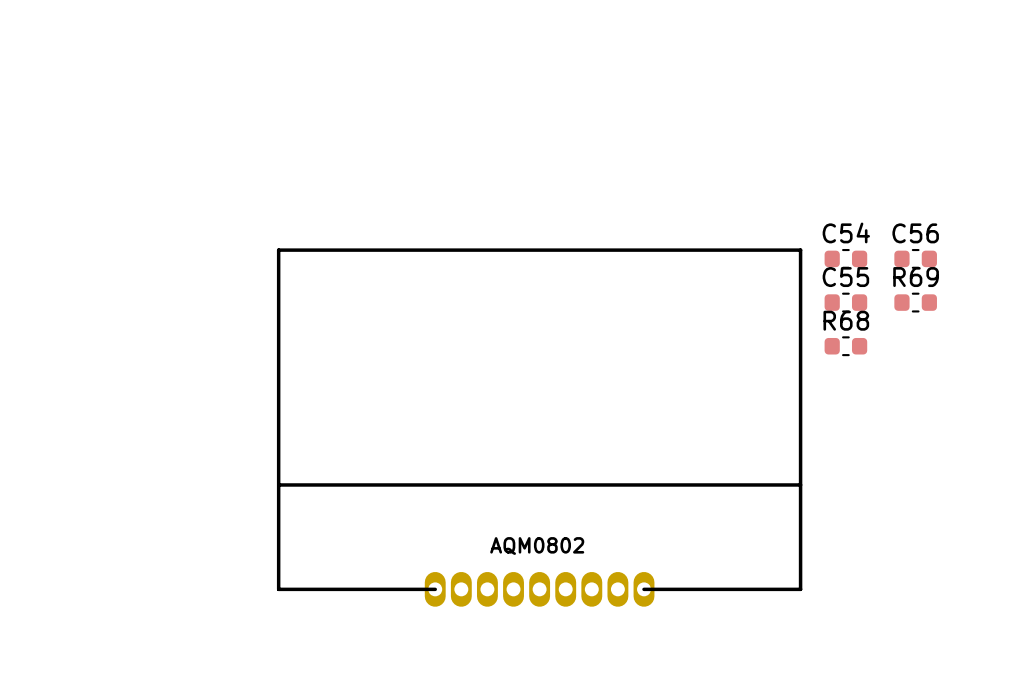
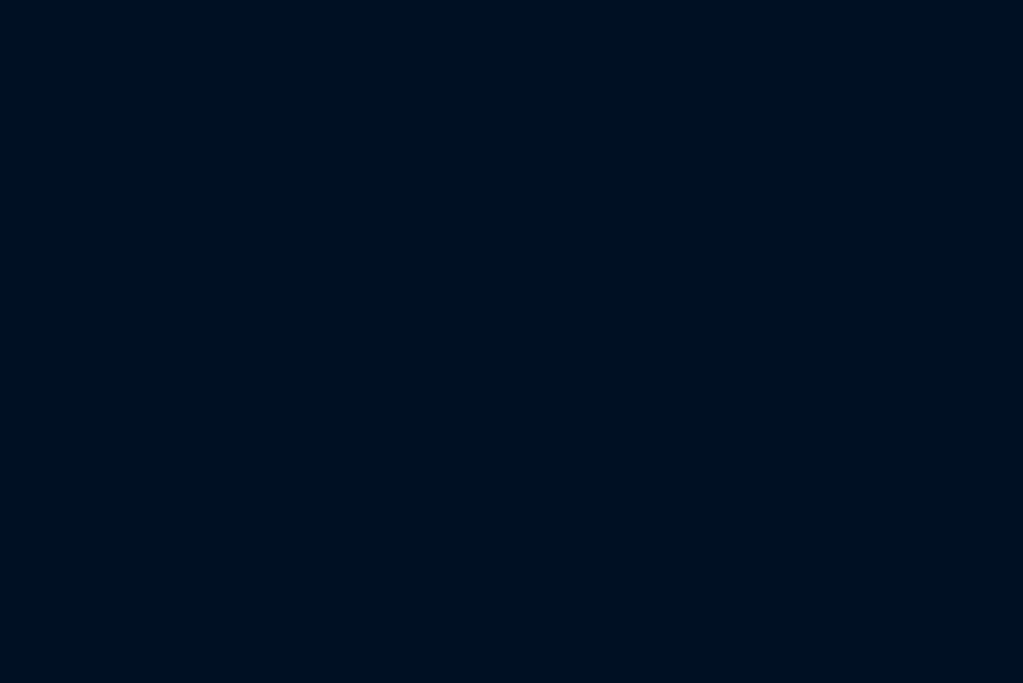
C54: (845, 258) -> none
C56: (915, 258) -> none
C55: (845, 302) -> none
R69: (915, 302) -> none
R68: (845, 346) -> none
part: AQM0802 (539, 427) -> none

